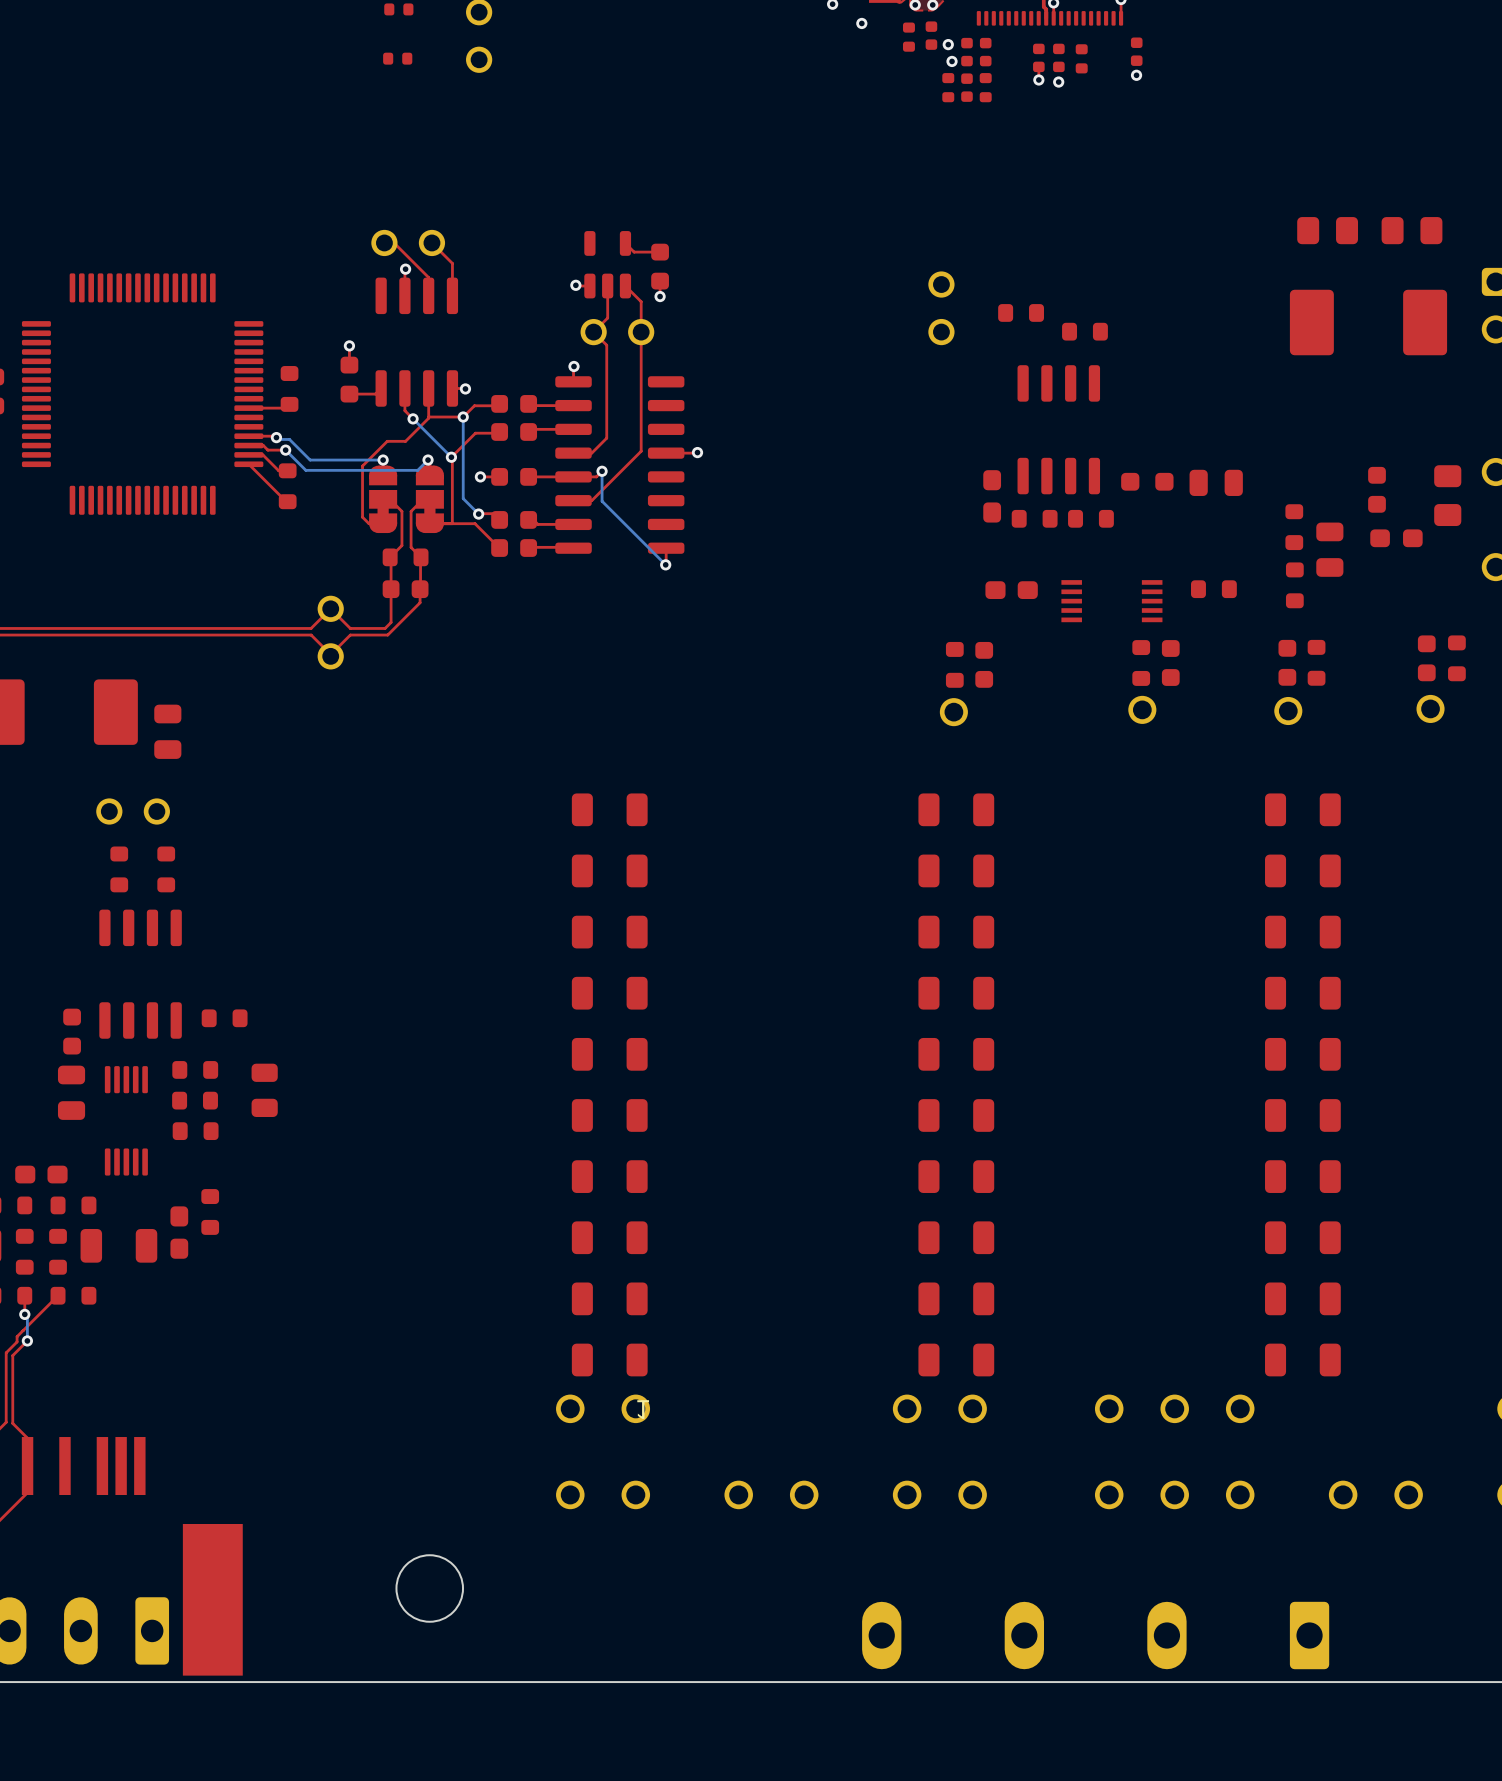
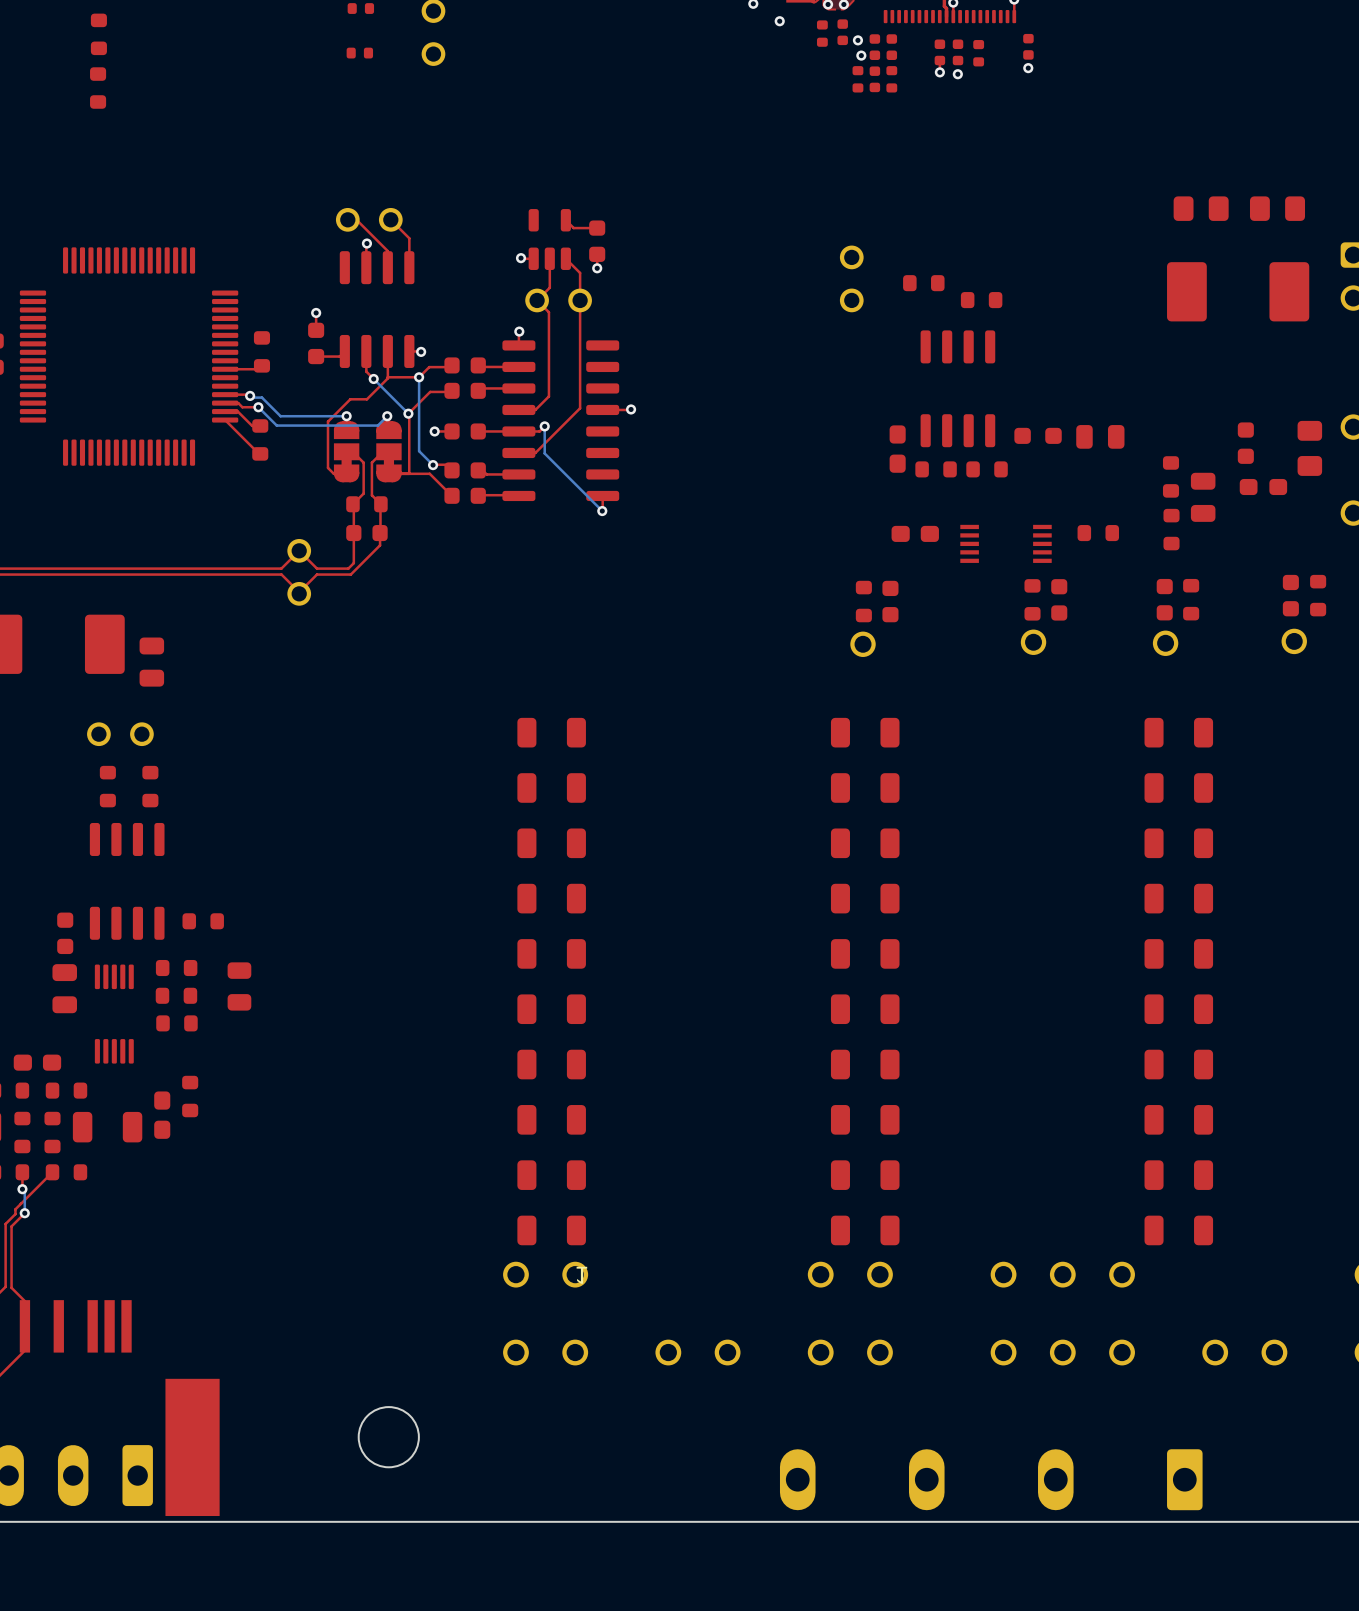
part: none -> (98, 34)
part: none -> (98, 88)

